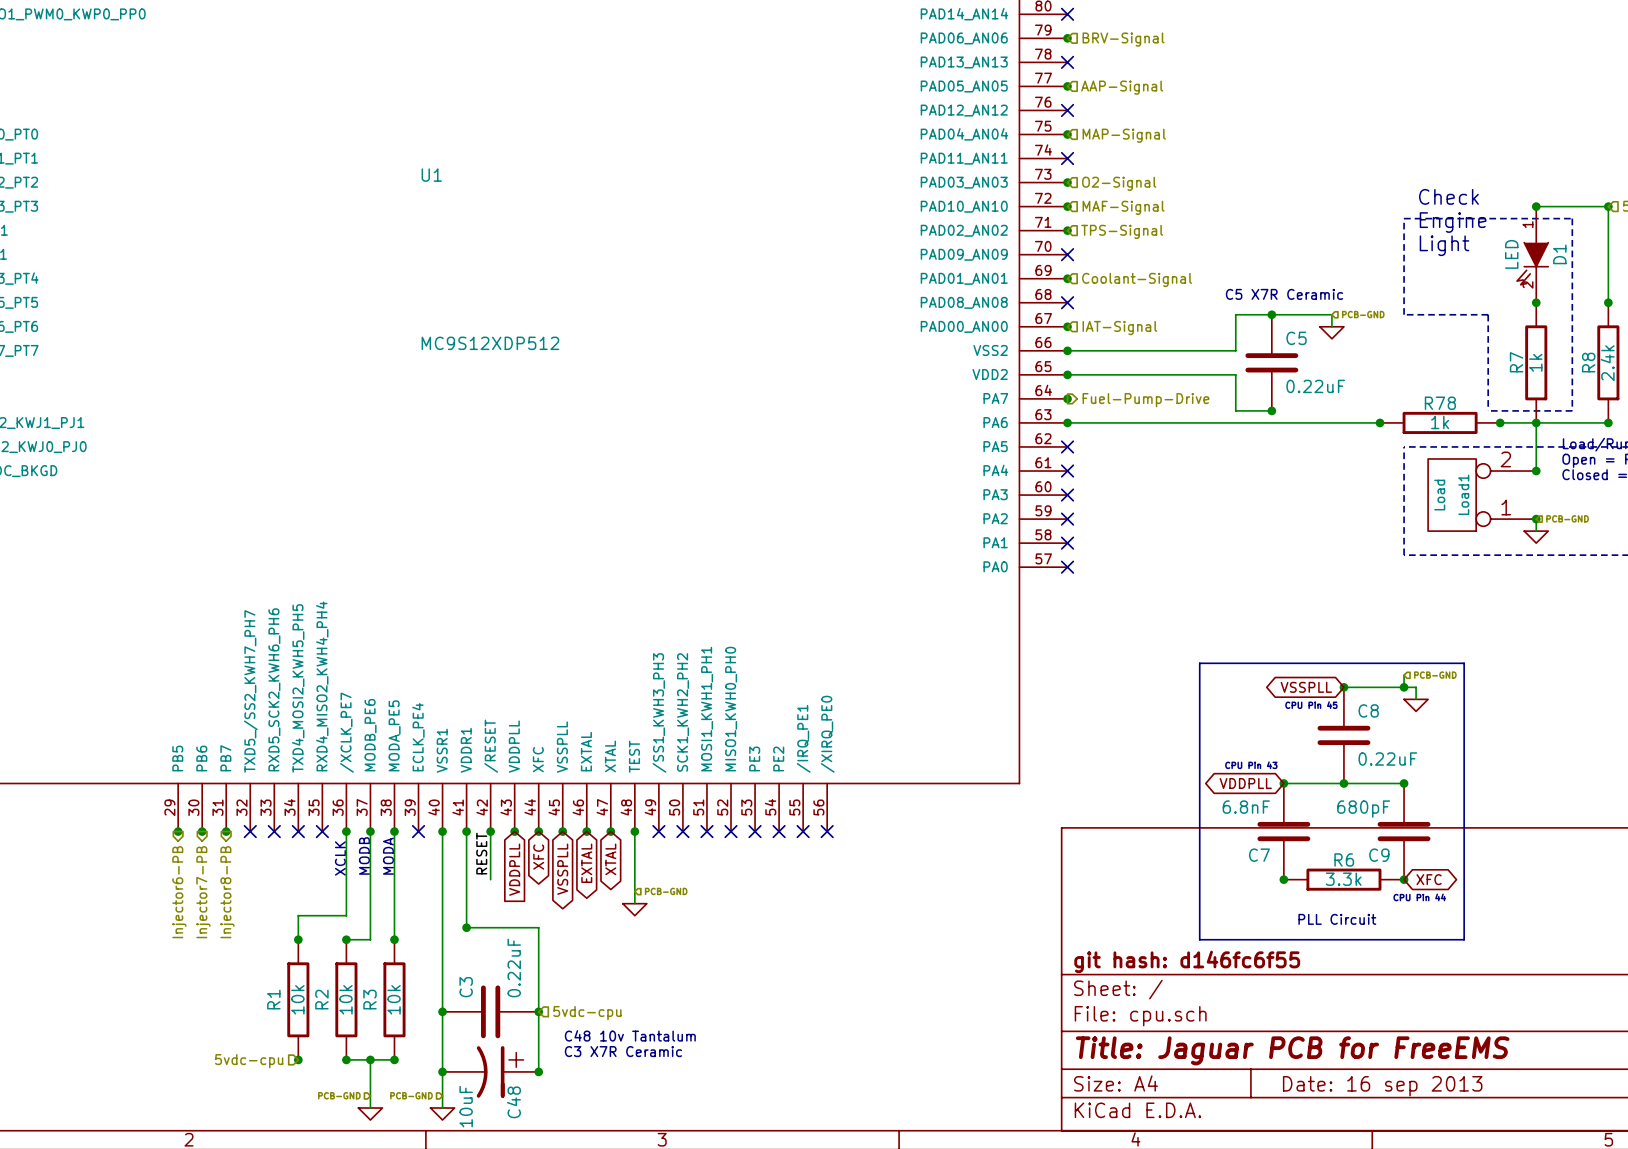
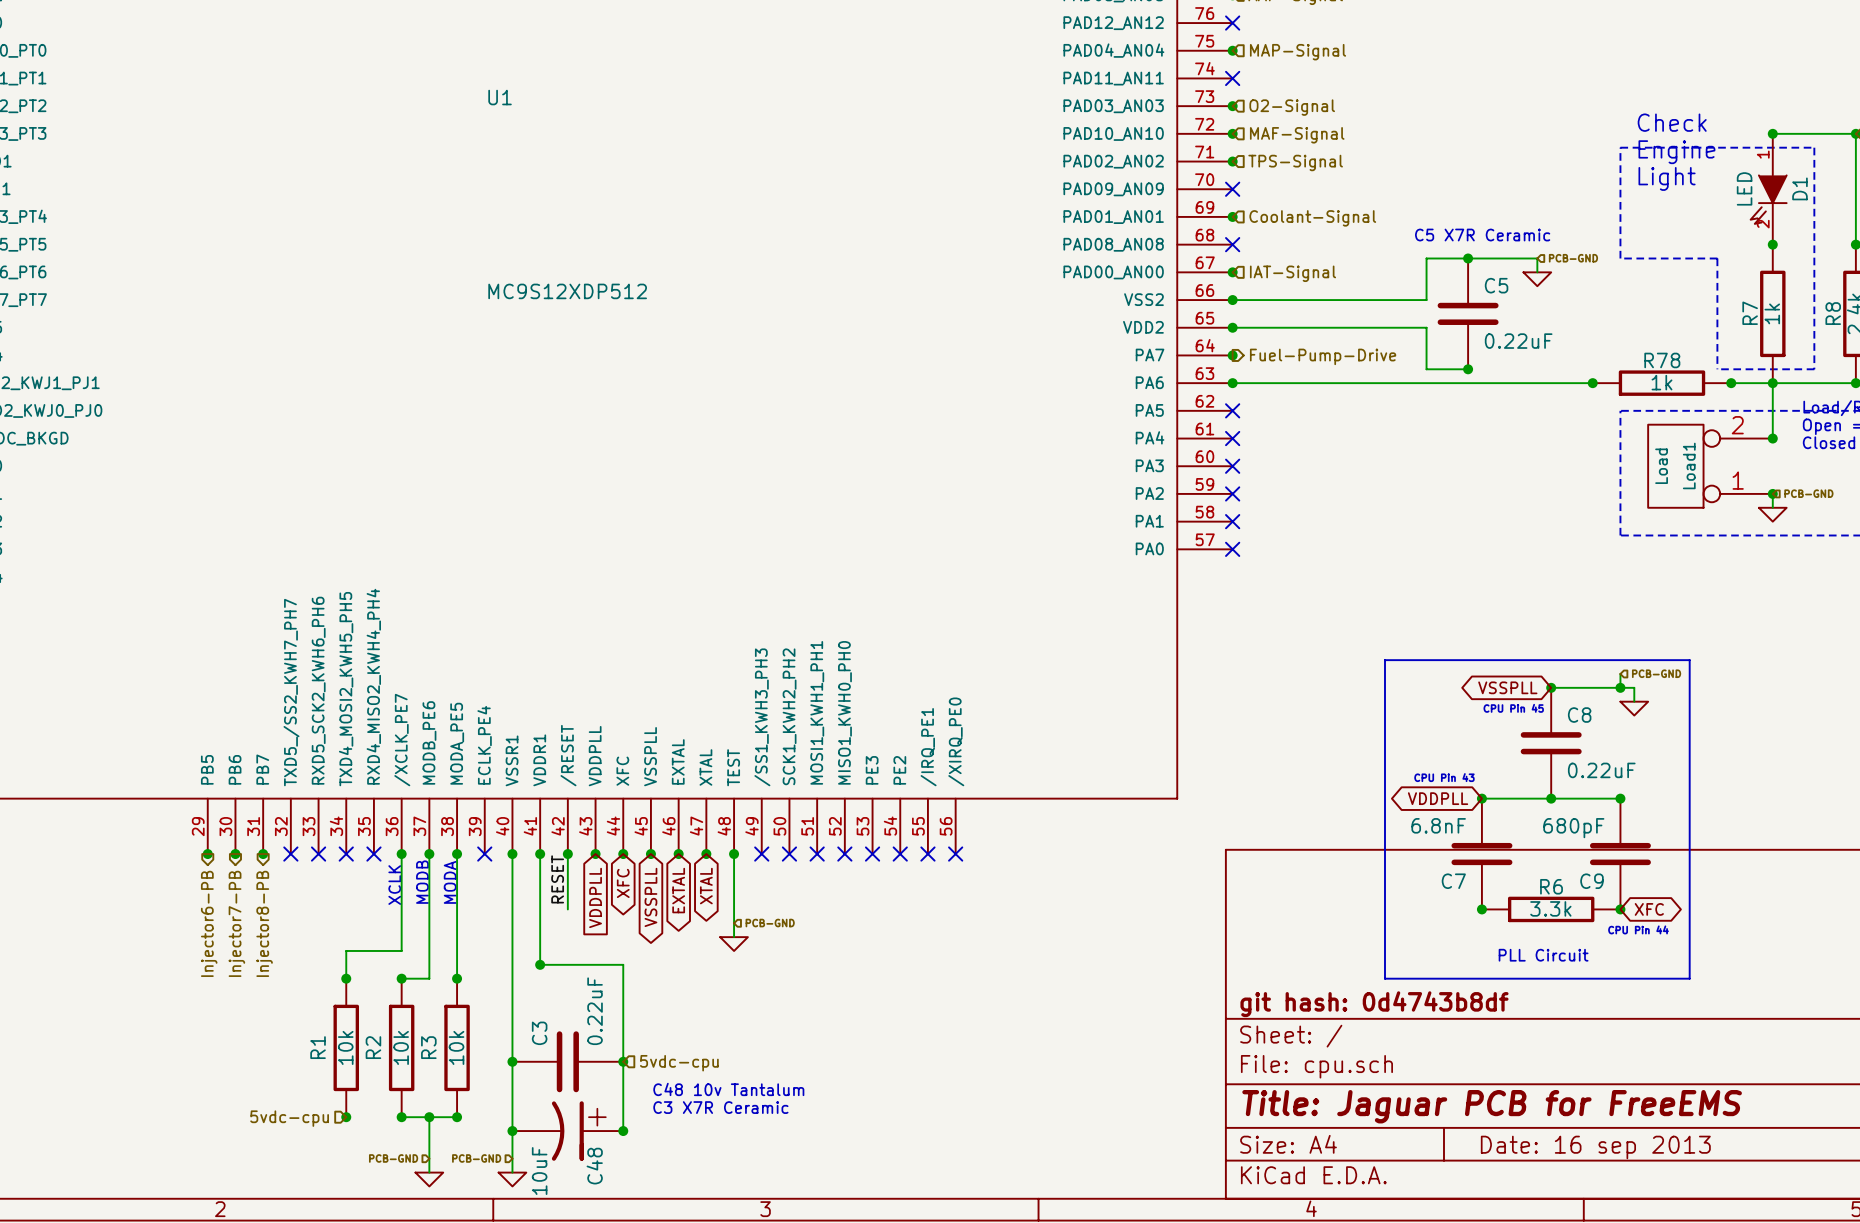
title block: git hash: d146fc6f55 (1187, 961) -> git hash: 0d4743b8df (1374, 1004)

